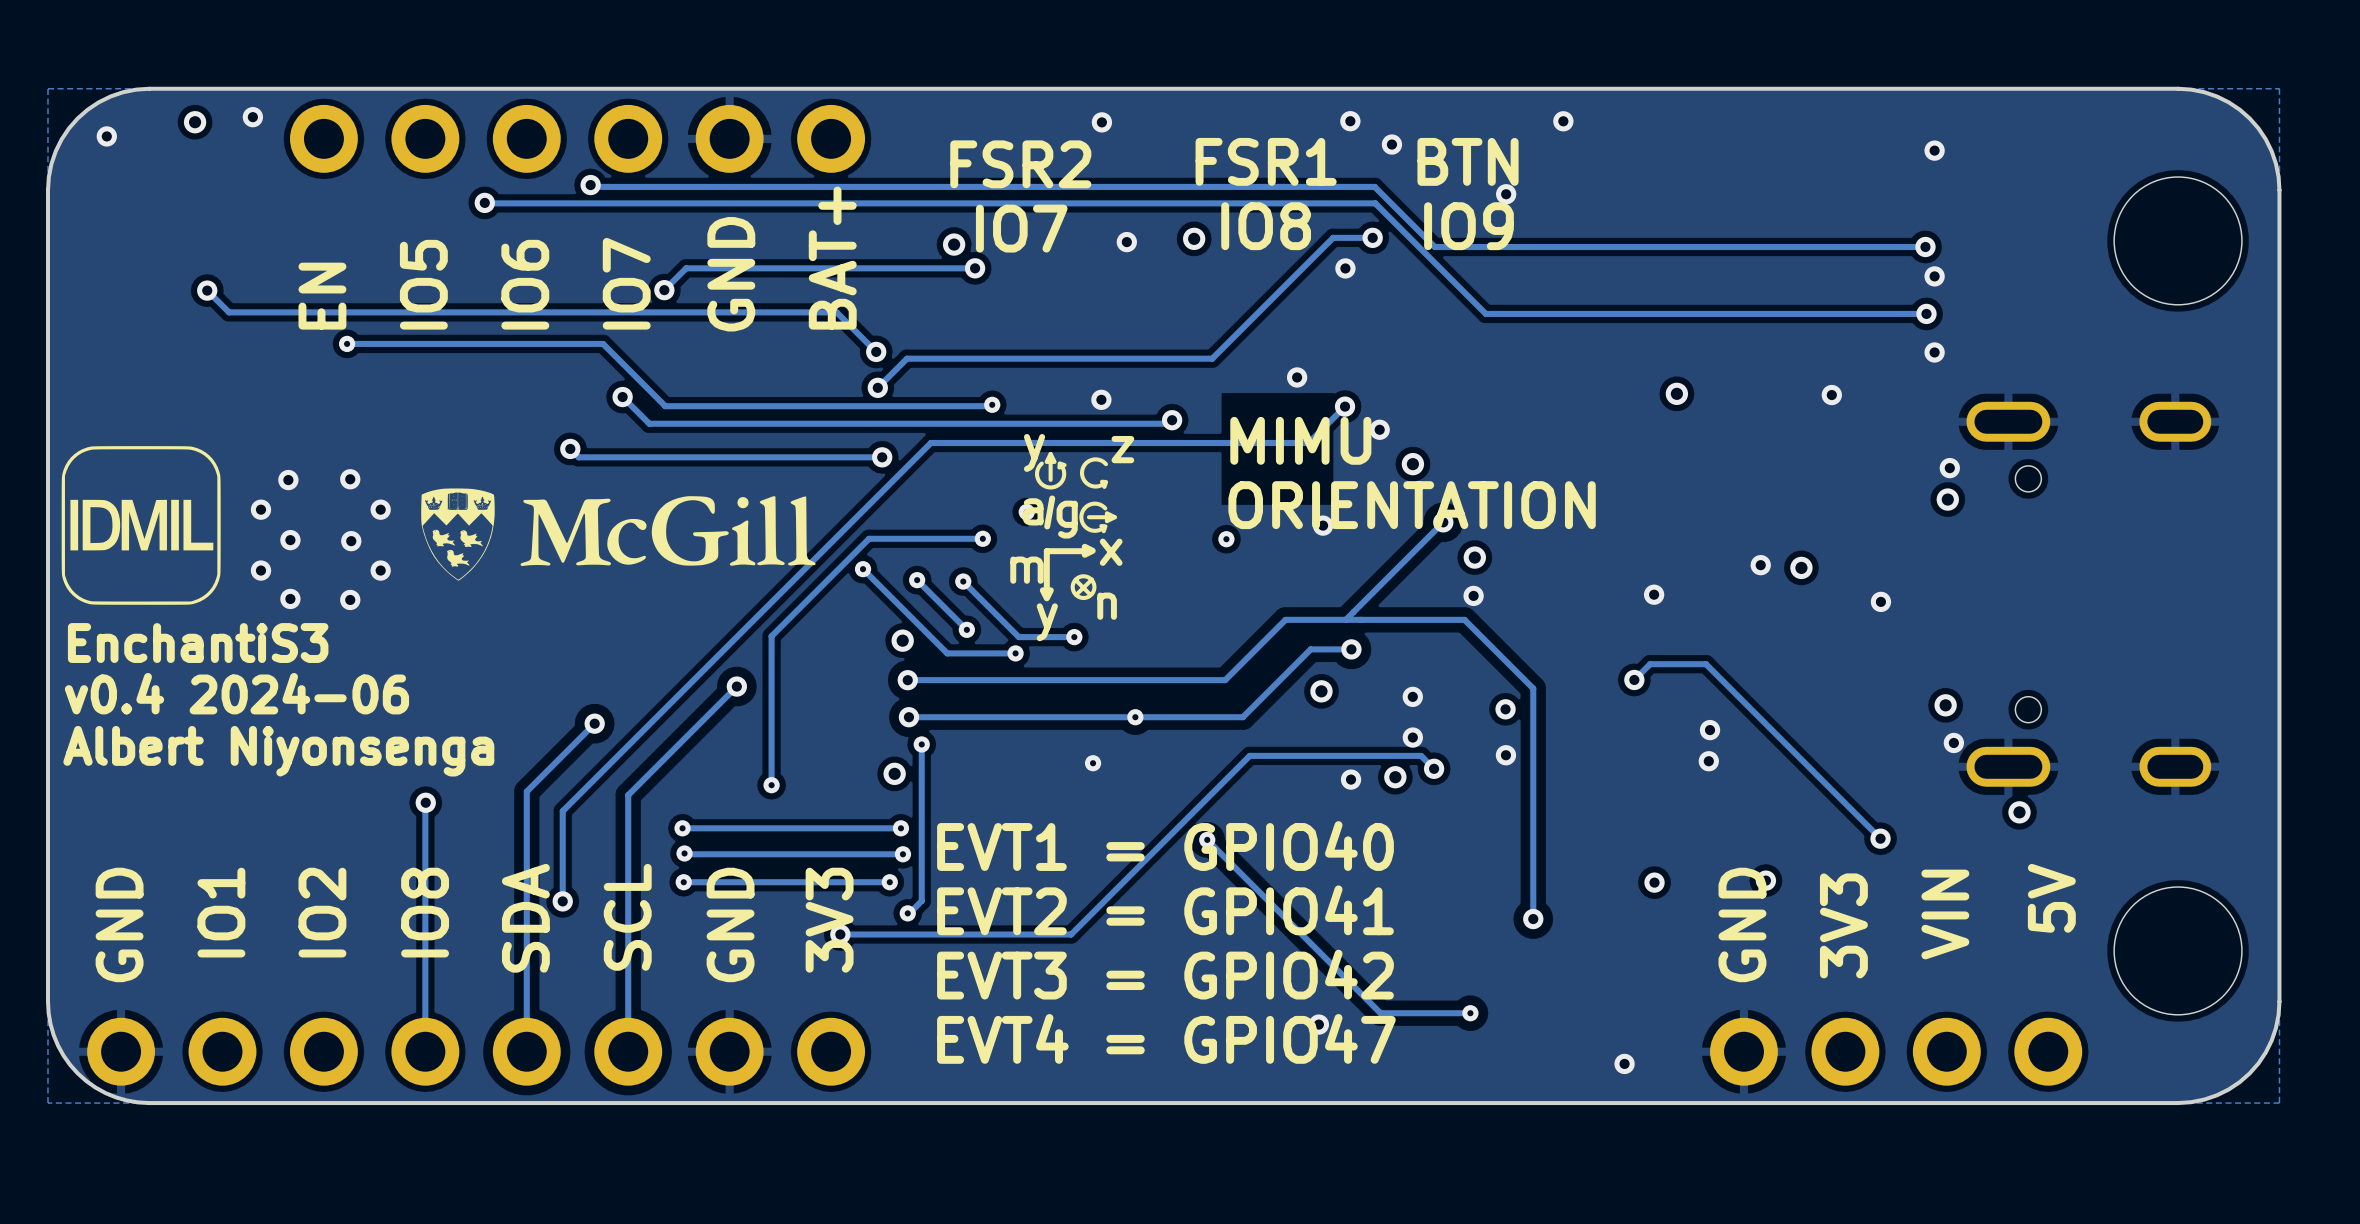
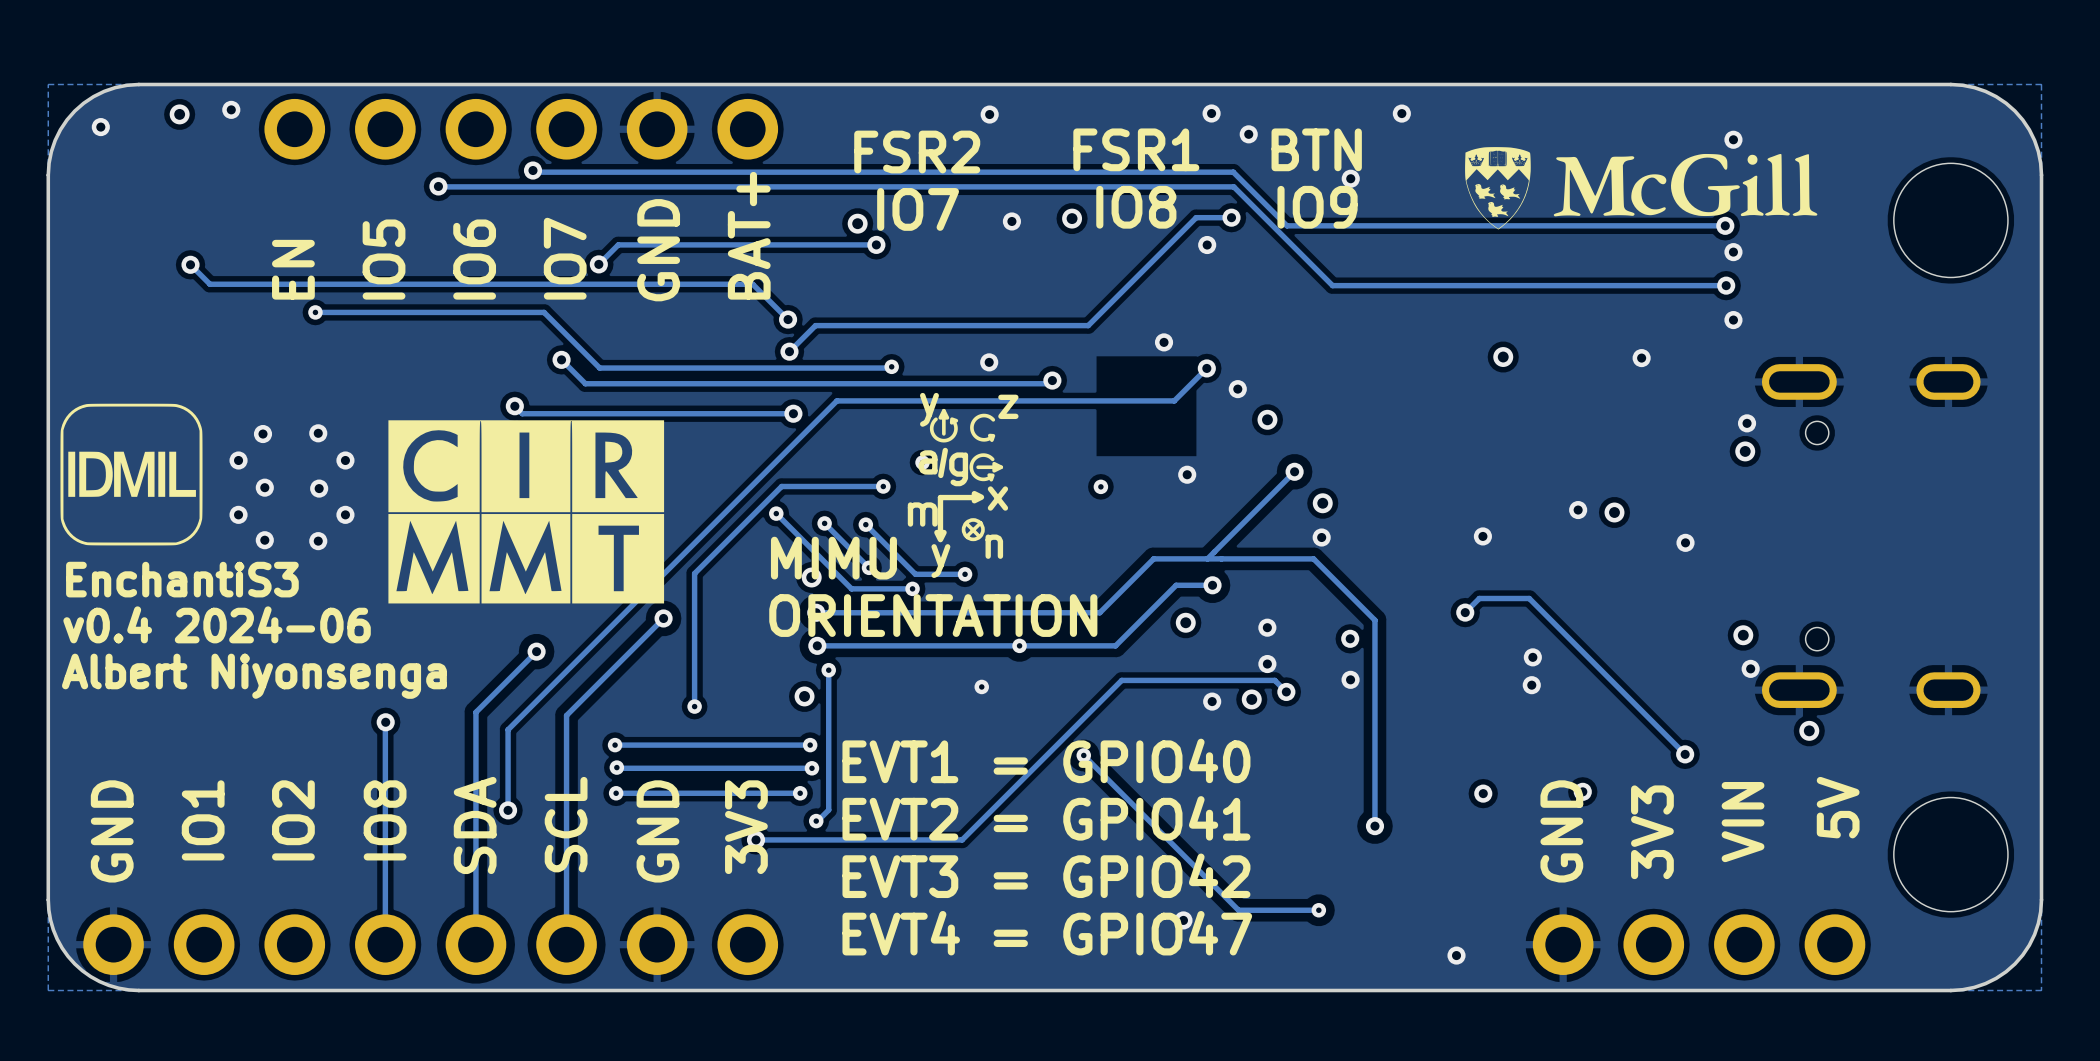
drawing: none -> [1465, 147, 1818, 230]
text position: MIMU (1300, 440) -> MIMU (833, 558)
drawing: none -> [388, 420, 665, 604]
drawing: [421, 488, 816, 581] -> none
text position: ORIENTATION (1412, 505) -> ORIENTATION (933, 615)

